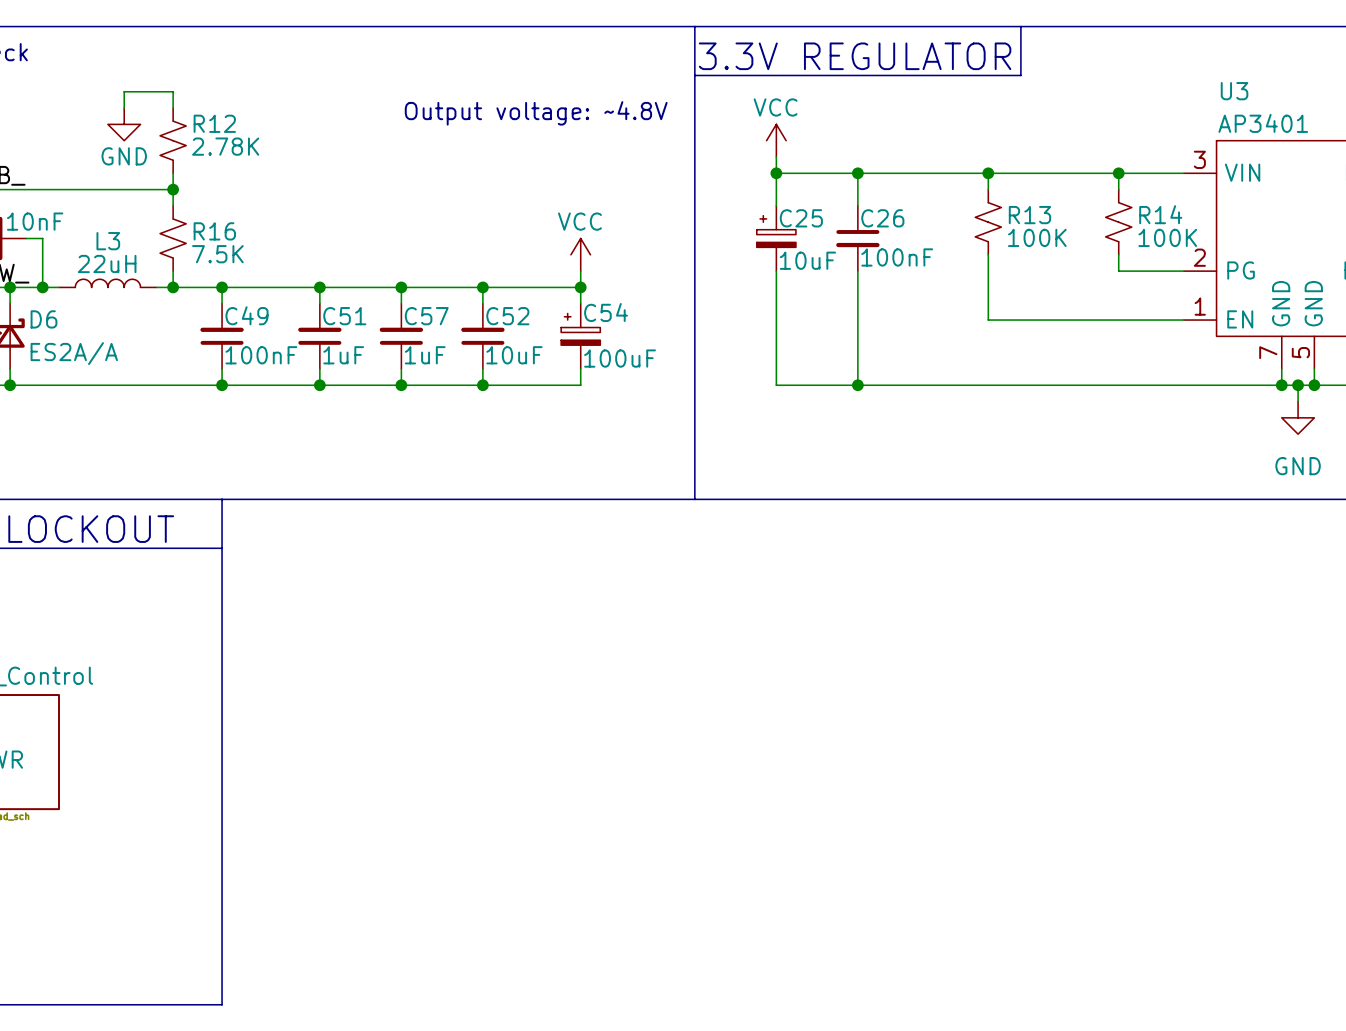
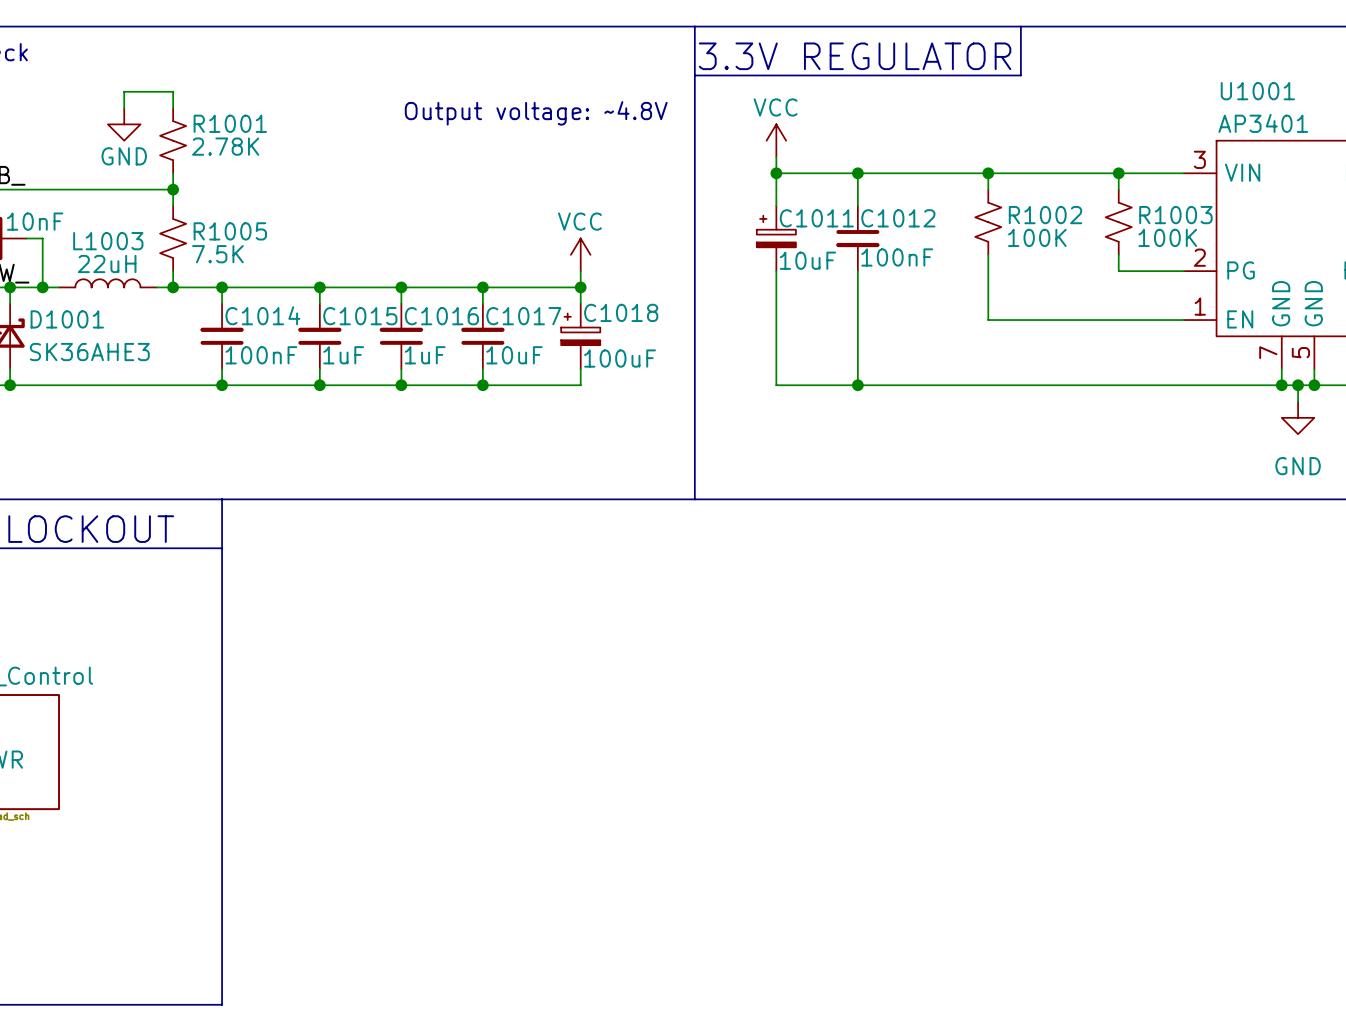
U3 name: U3 (1234, 91) -> U1001 (1257, 91)
R12 name: R12 (214, 123) -> R1001 (230, 123)
R14 name: R14 (1160, 214) -> R1003 (1175, 215)
R13 name: R13 (1029, 215) -> R1002 (1045, 215)
C25 name: C25 (801, 218) -> C1011 (816, 218)
C26 name: C26 (882, 218) -> C1012 (898, 218)
R16 name: R16 (214, 231) -> R1005 (230, 231)
L3 name: L3 (108, 241) -> L1003 (108, 241)
C54 name: C54 (606, 312) -> C1018 (621, 312)
C49 name: C49 (247, 315) -> C1014 (262, 315)
C51 name: C51 (344, 316) -> C1015 (360, 316)
C57 name: C57 (426, 316) -> C1016 (441, 316)
C52 name: C52 (507, 316) -> C1017 (523, 316)
D6 name: D6 (43, 319) -> D1001 (67, 319)
D6 value: ES2A/A (74, 353) -> SK36AHE3 (89, 352)

